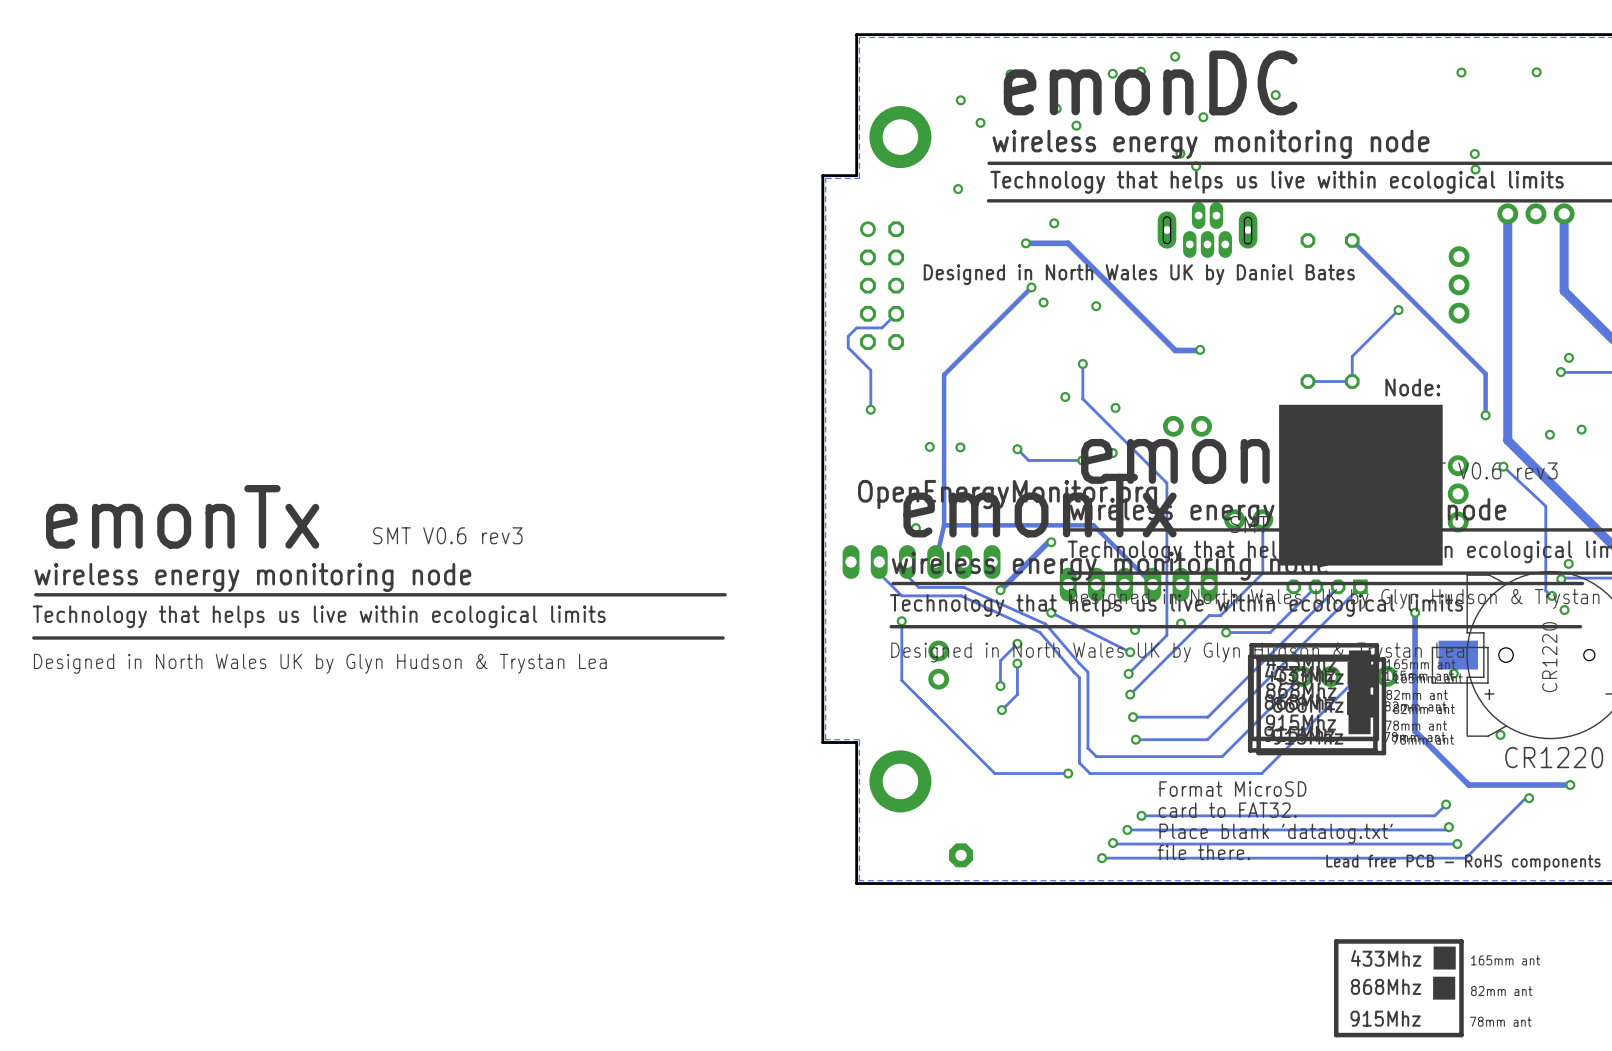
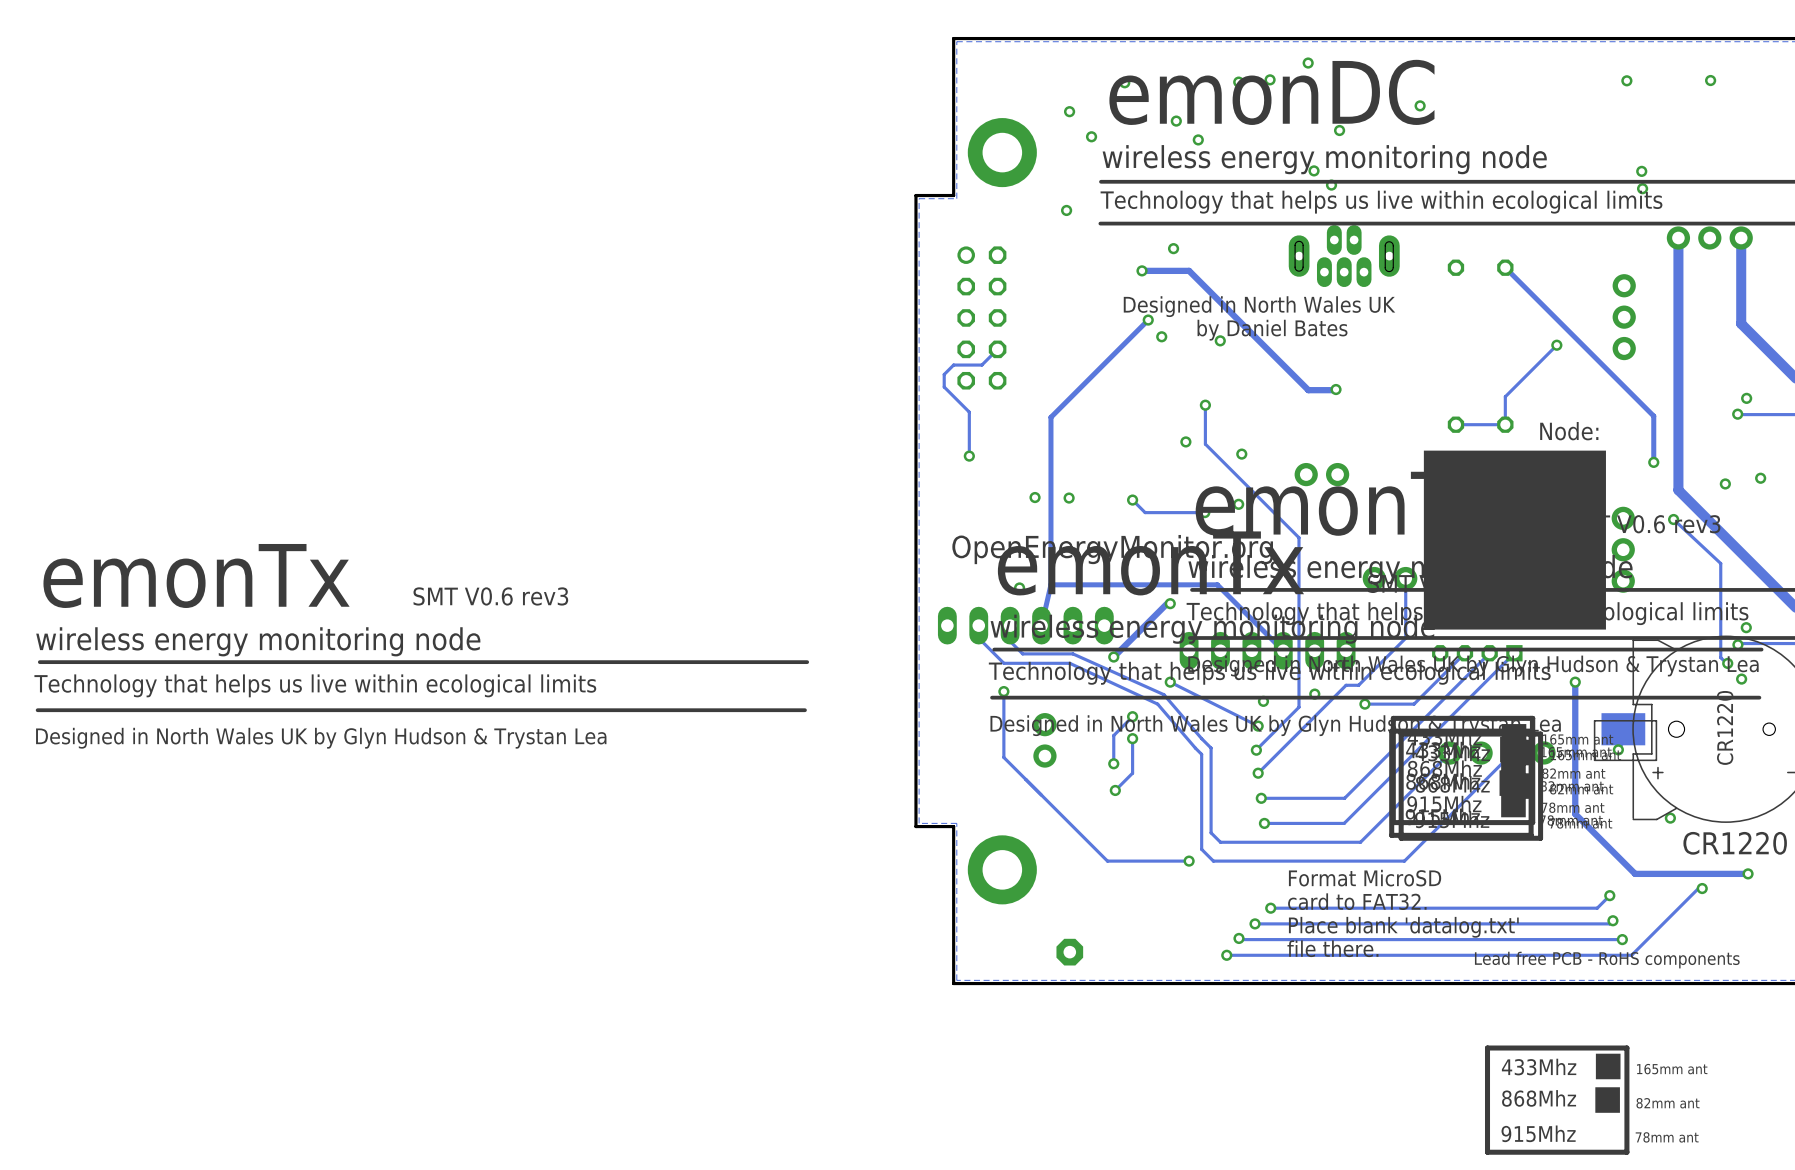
text: Designed in North Wales UK by Daniel Bates (1139, 274) -> Designed in North Wales UK (1259, 306)
text: none -> by Daniel Bates (1272, 330)

